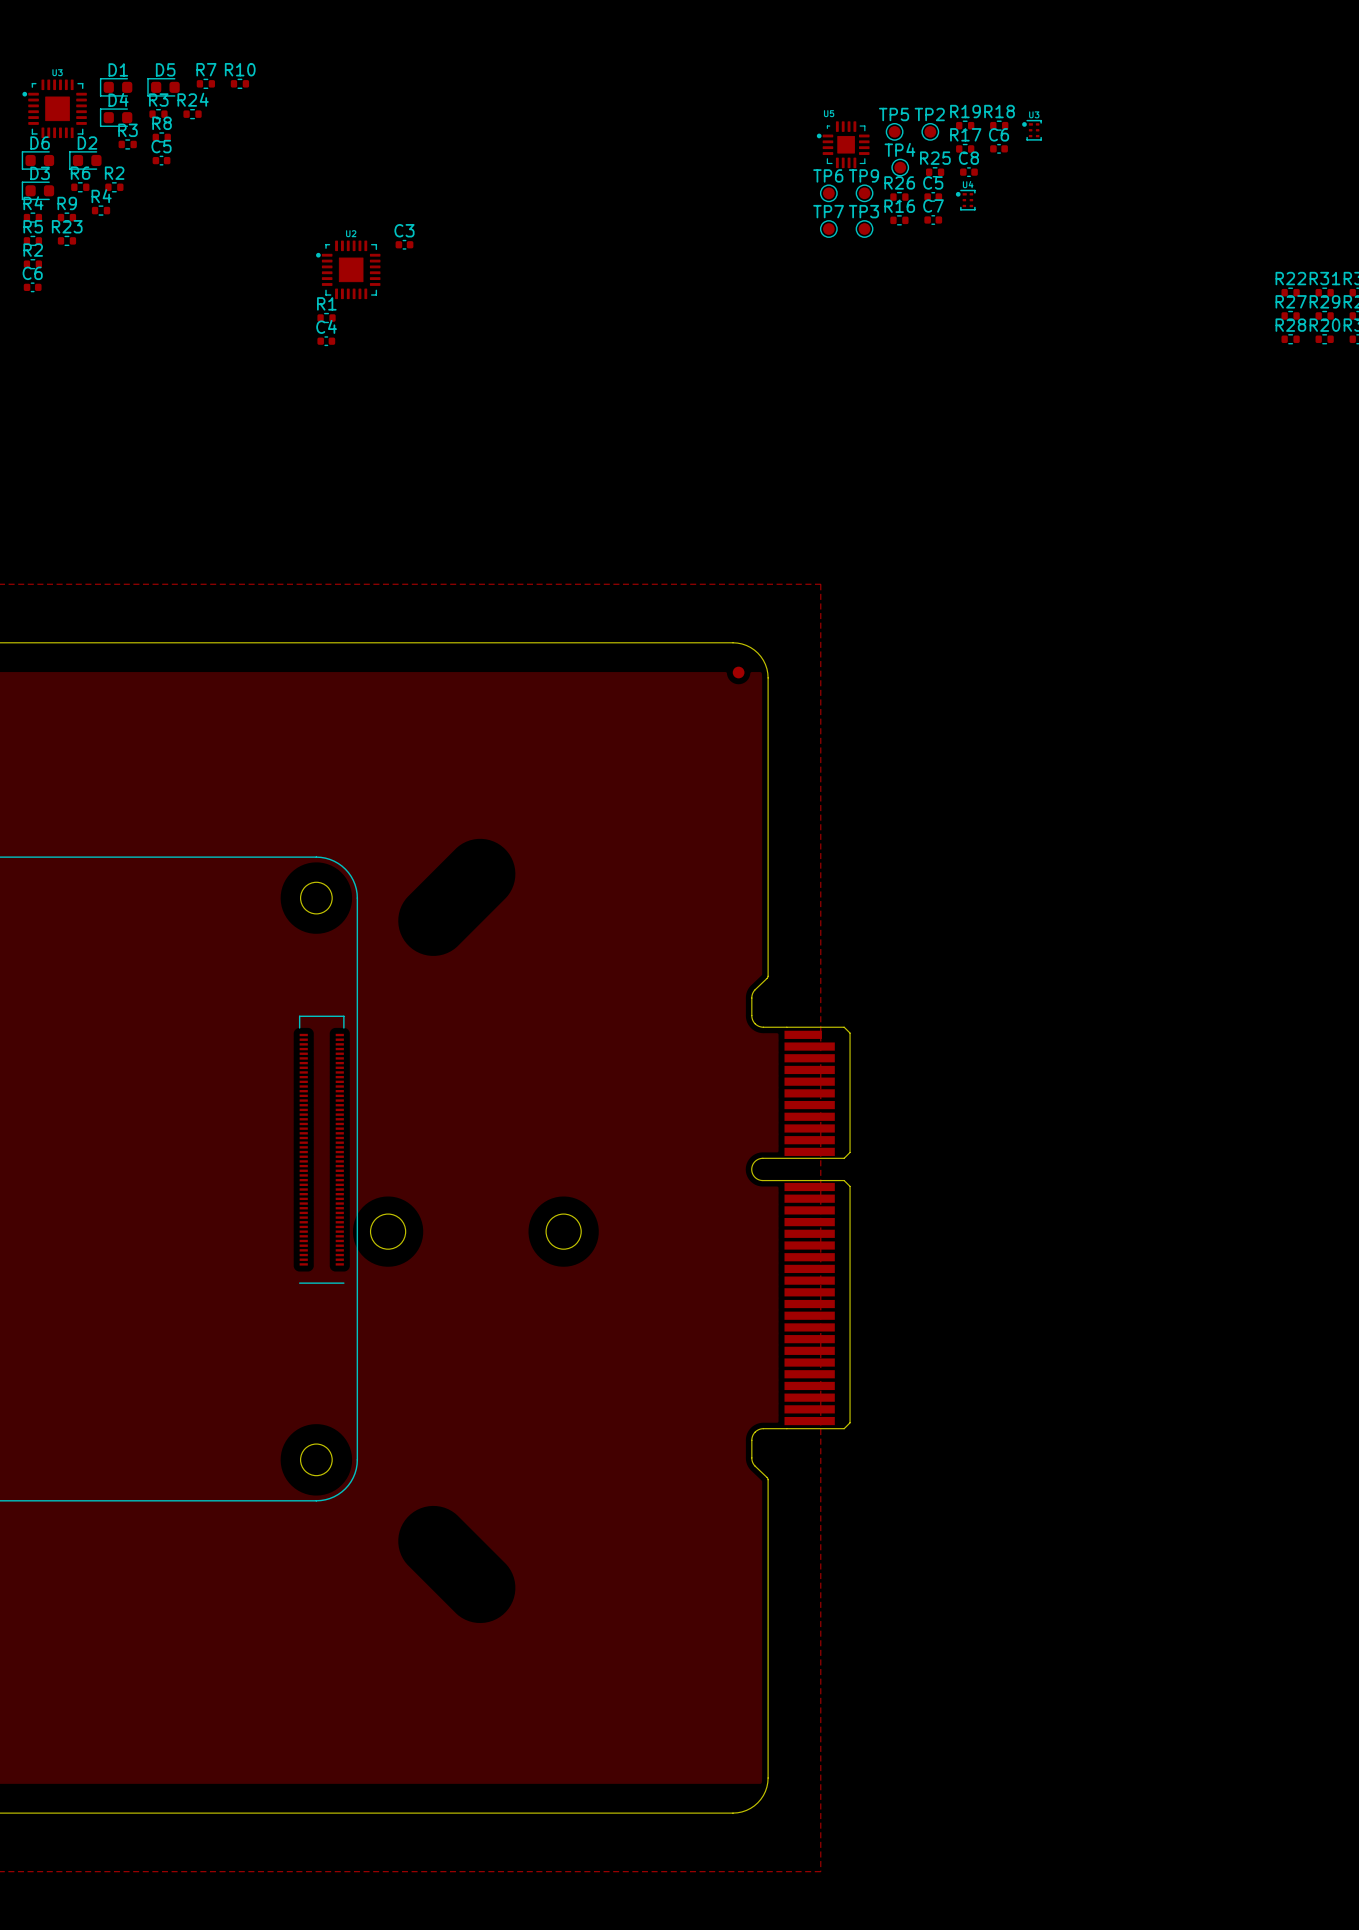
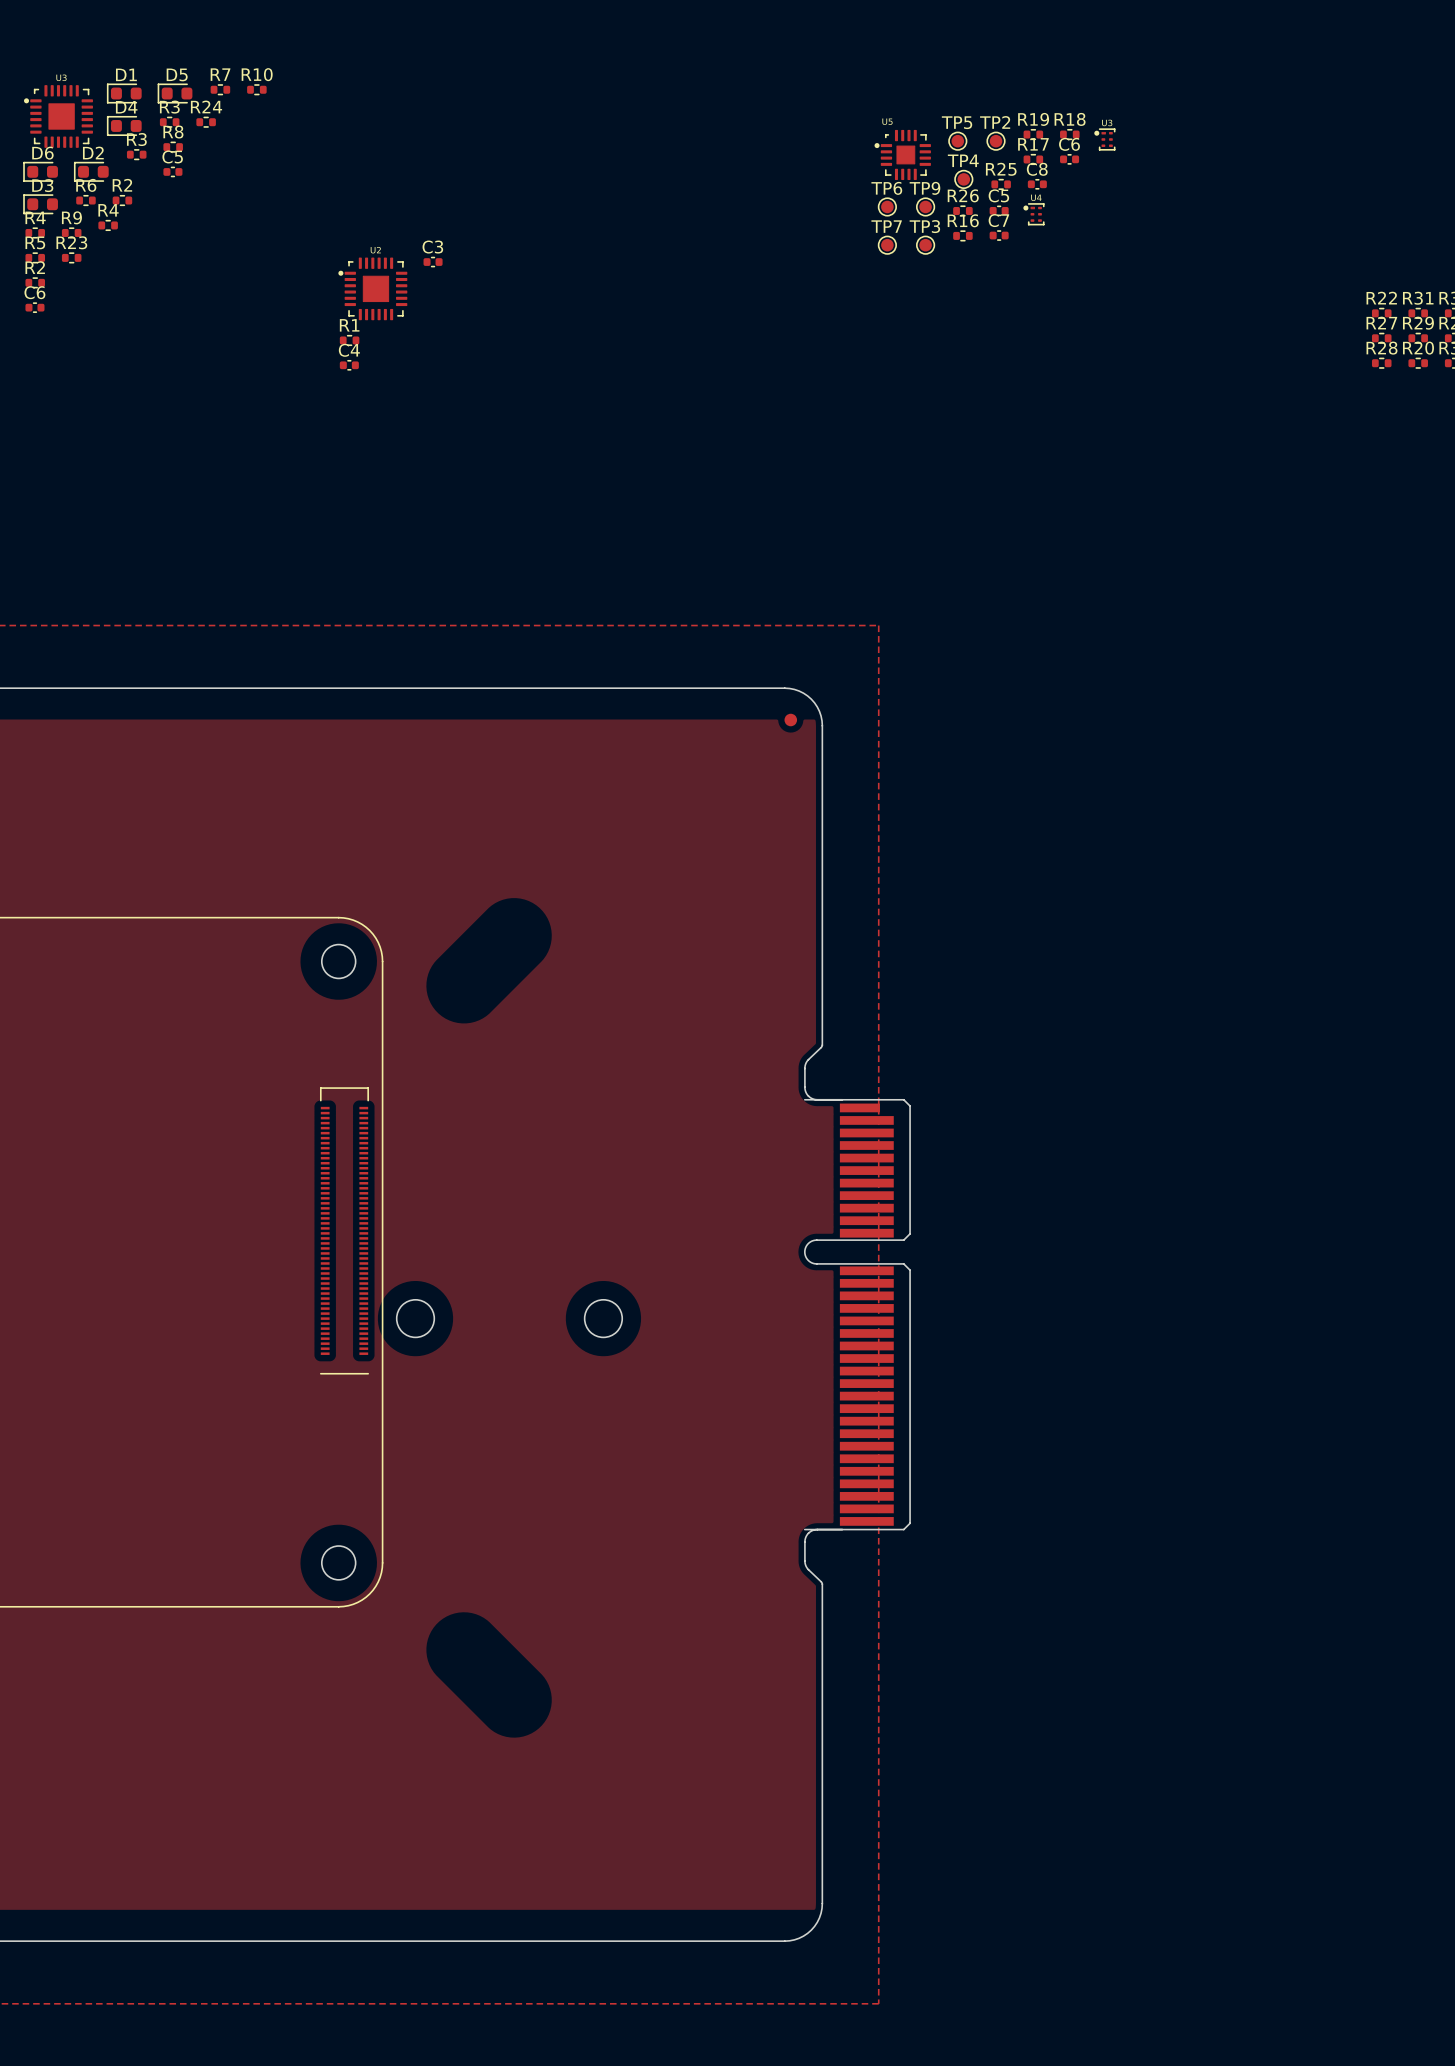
part footprint: [751, 1026, 851, 1430] -> [804, 1099, 911, 1531]

